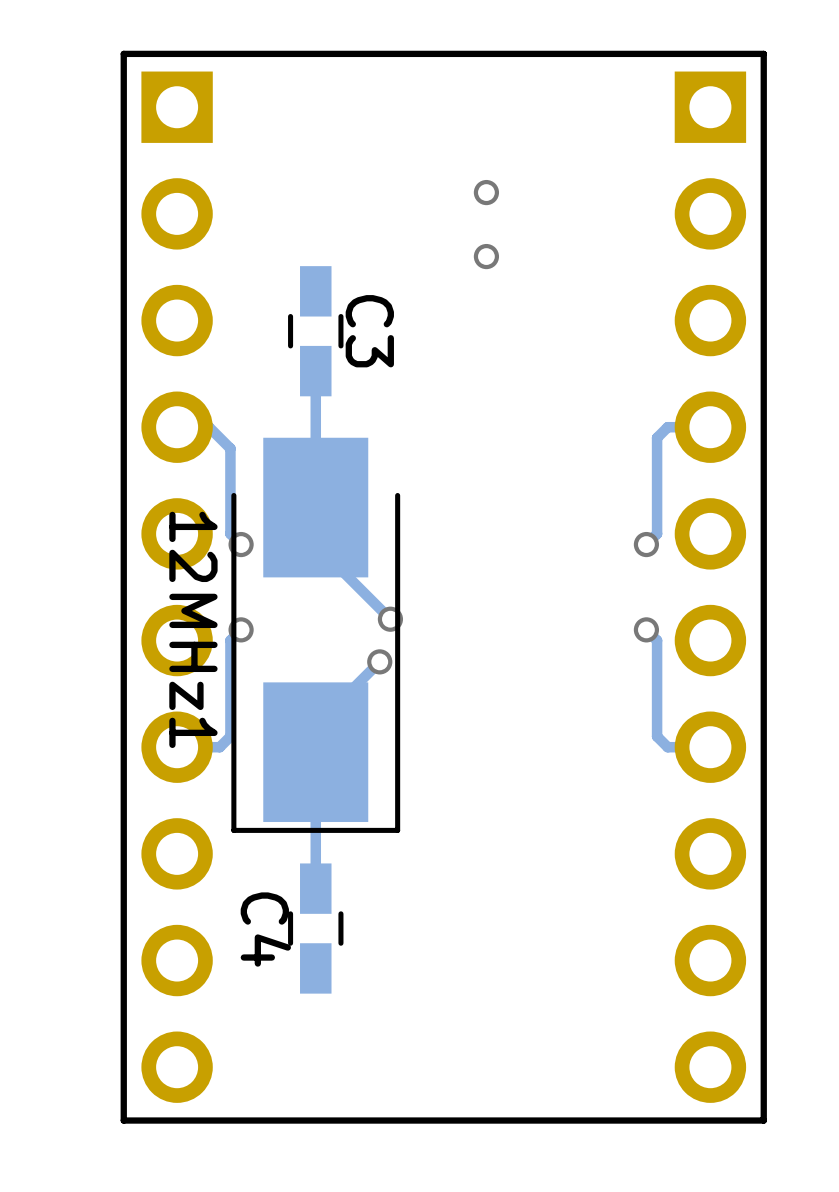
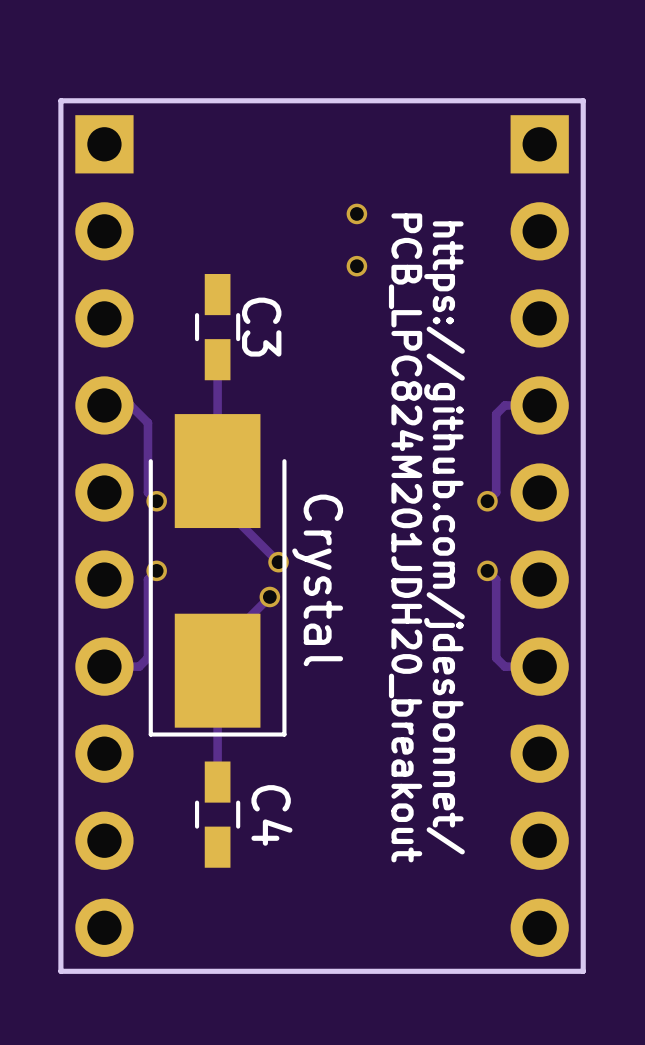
text: none -> PCB_LPC824M201JDH20_breakout (406, 537)
text: none -> https://github.com/jdesbonnet/ (444, 537)
12MHz1 name: 12MHz1 (193, 629) -> Crystal (317, 580)
C4 name position: C4 (265, 929) -> C4 (271, 815)

